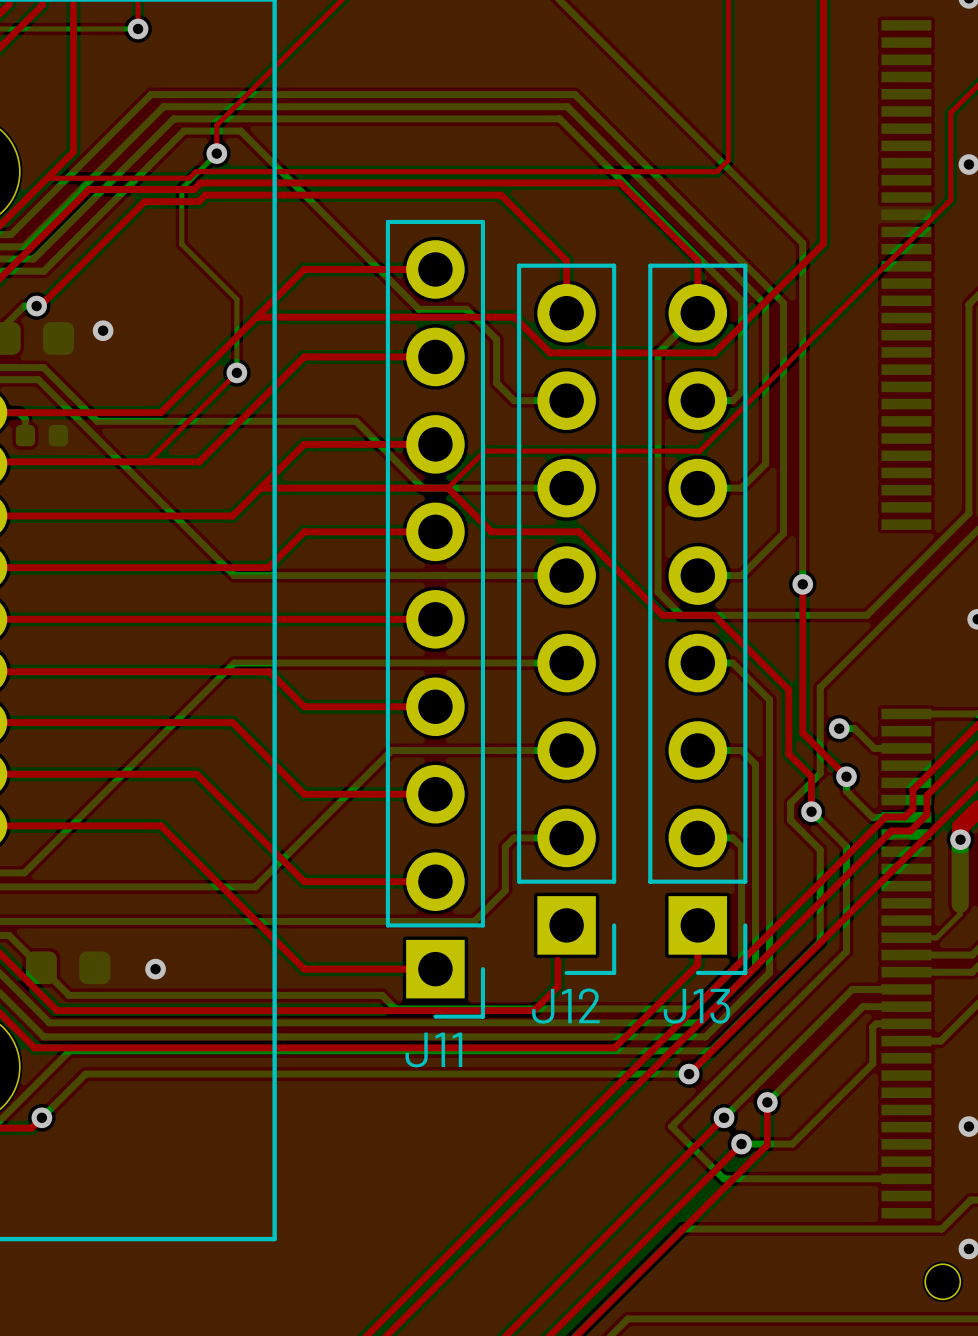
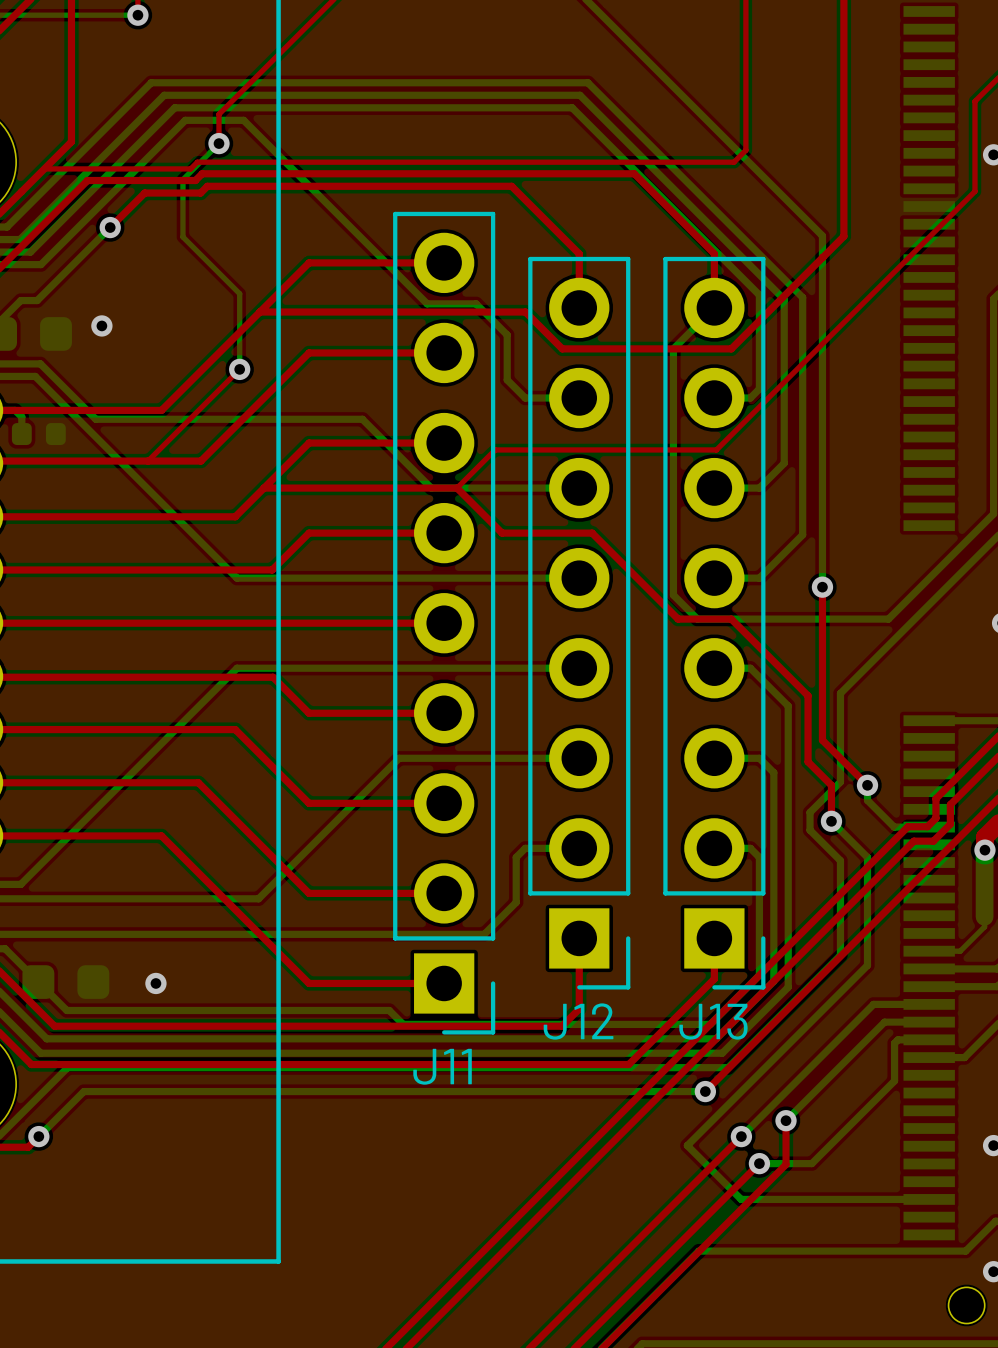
bottom track: none -> (110, 227) (37, 300) (33, 300)
top track: (111, 235) (40, 306) (36, 306) -> none
via position: (36, 306) -> (110, 227)
bottom track: (839, 728) (854, 728) (874, 748) (906, 748) -> none
via: (839, 728) -> none
top track: (557, 960) (557, 986) (533, 1010) -> (579, 938) (579, 1009) (562, 1026) (545, 1026)

